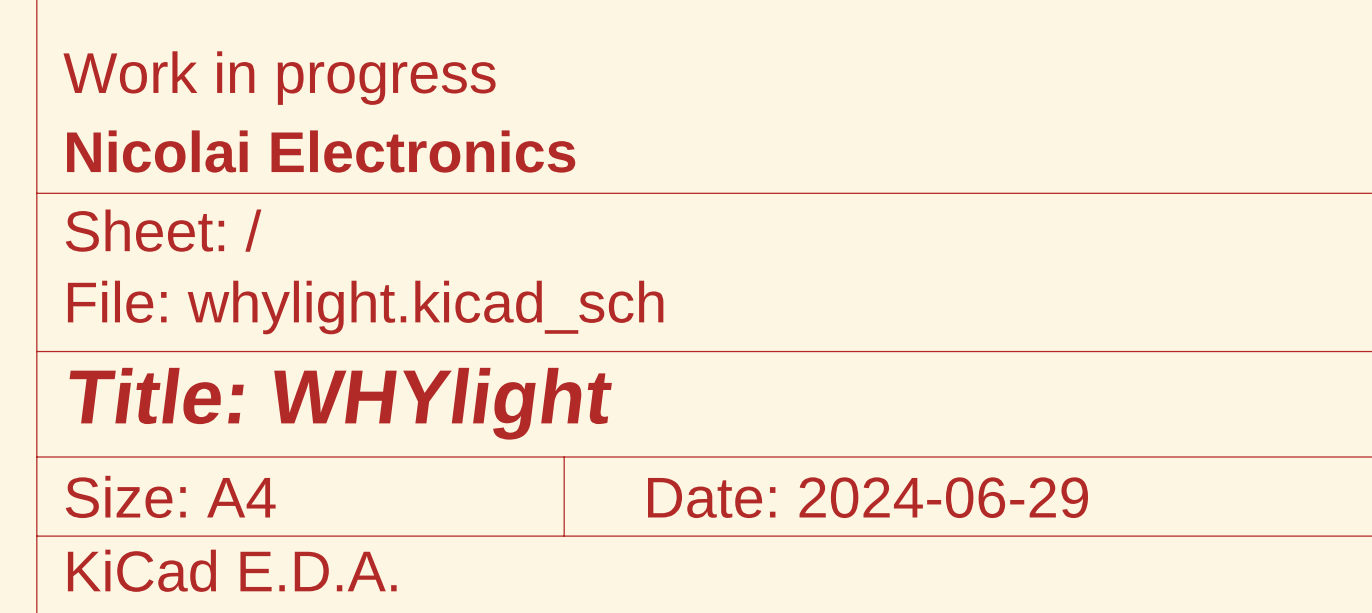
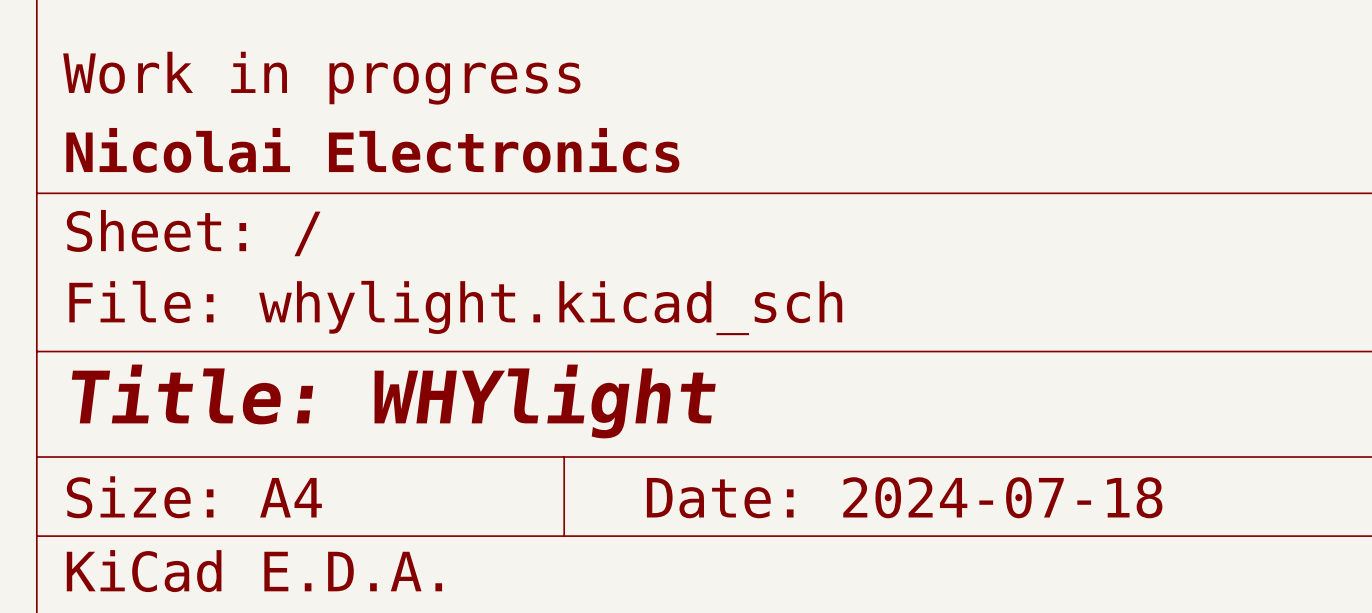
title block: Date: 2024-06-29 (868, 497) -> Date: 2024-07-18 (904, 497)

